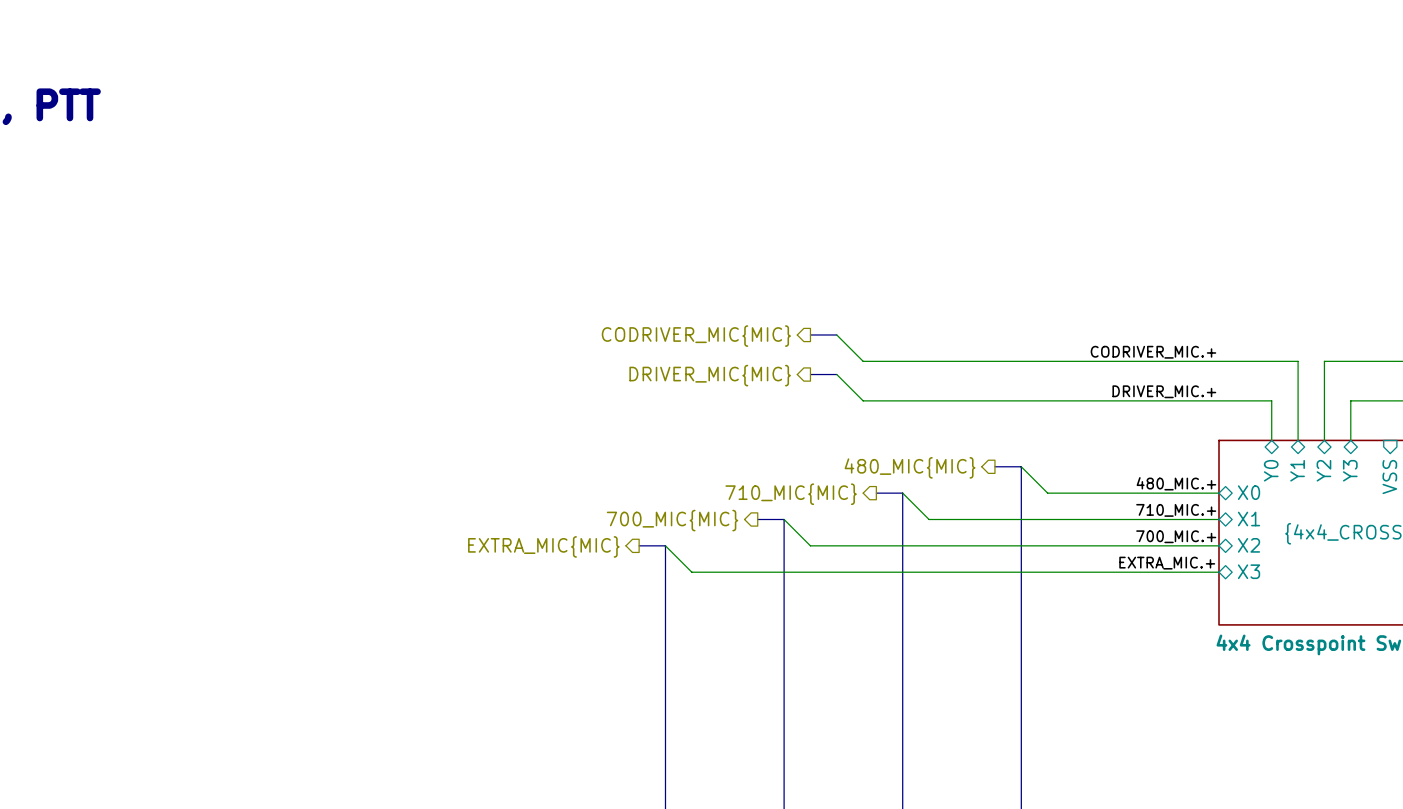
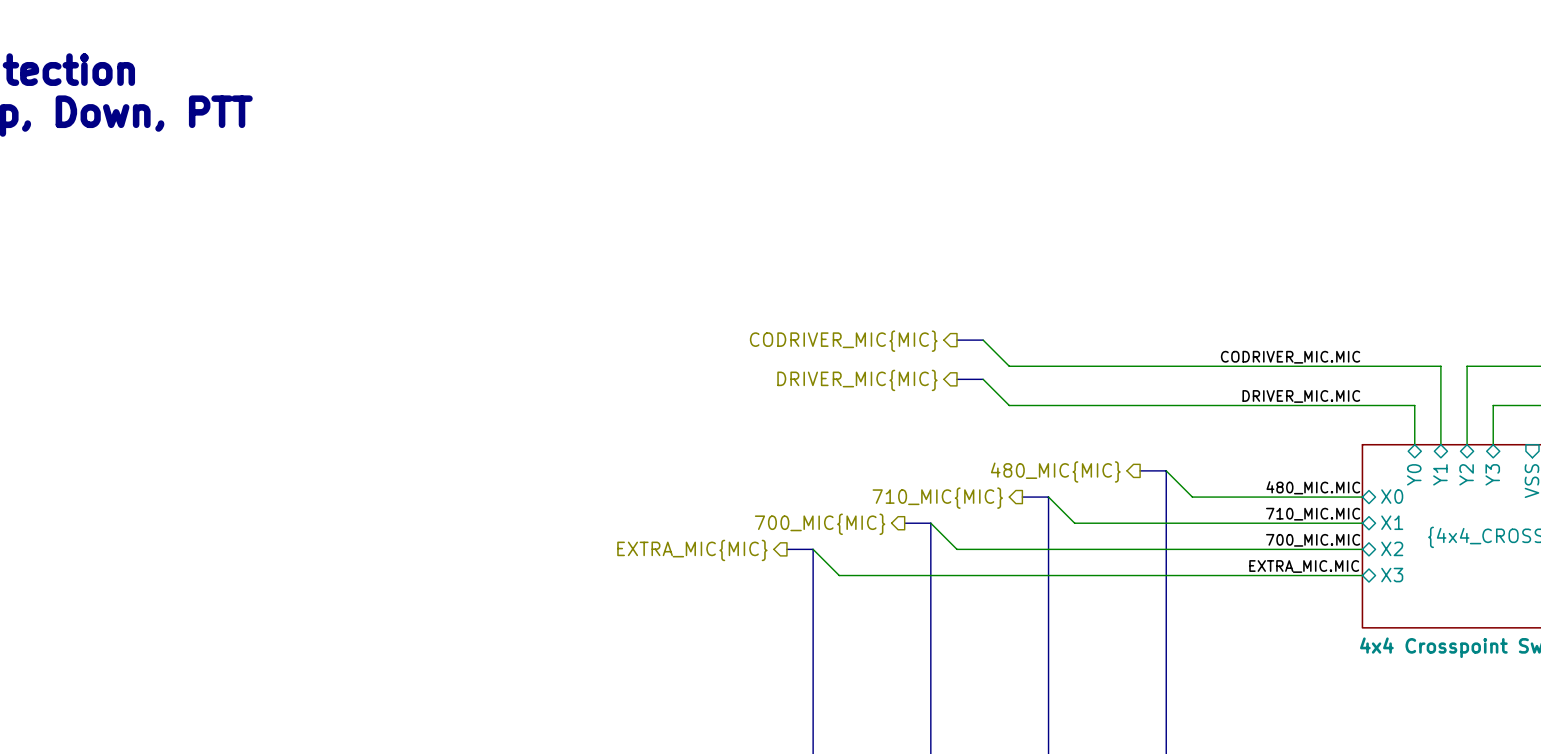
label: CODRIVER_MIC.+ (1153, 352) -> CODRIVER_MIC.MIC (1290, 357)
label: DRIVER_MIC.+ (1164, 391) -> DRIVER_MIC.MIC (1301, 396)
label: 480_MIC.+ (1176, 483) -> 480_MIC.MIC (1313, 487)
label: 710_MIC.+ (1176, 510) -> 710_MIC.MIC (1313, 514)
label: 700_MIC.+ (1176, 536) -> 700_MIC.MIC (1313, 540)
label: EXTRA_MIC.+ (1167, 563) -> EXTRA_MIC.MIC (1304, 566)

